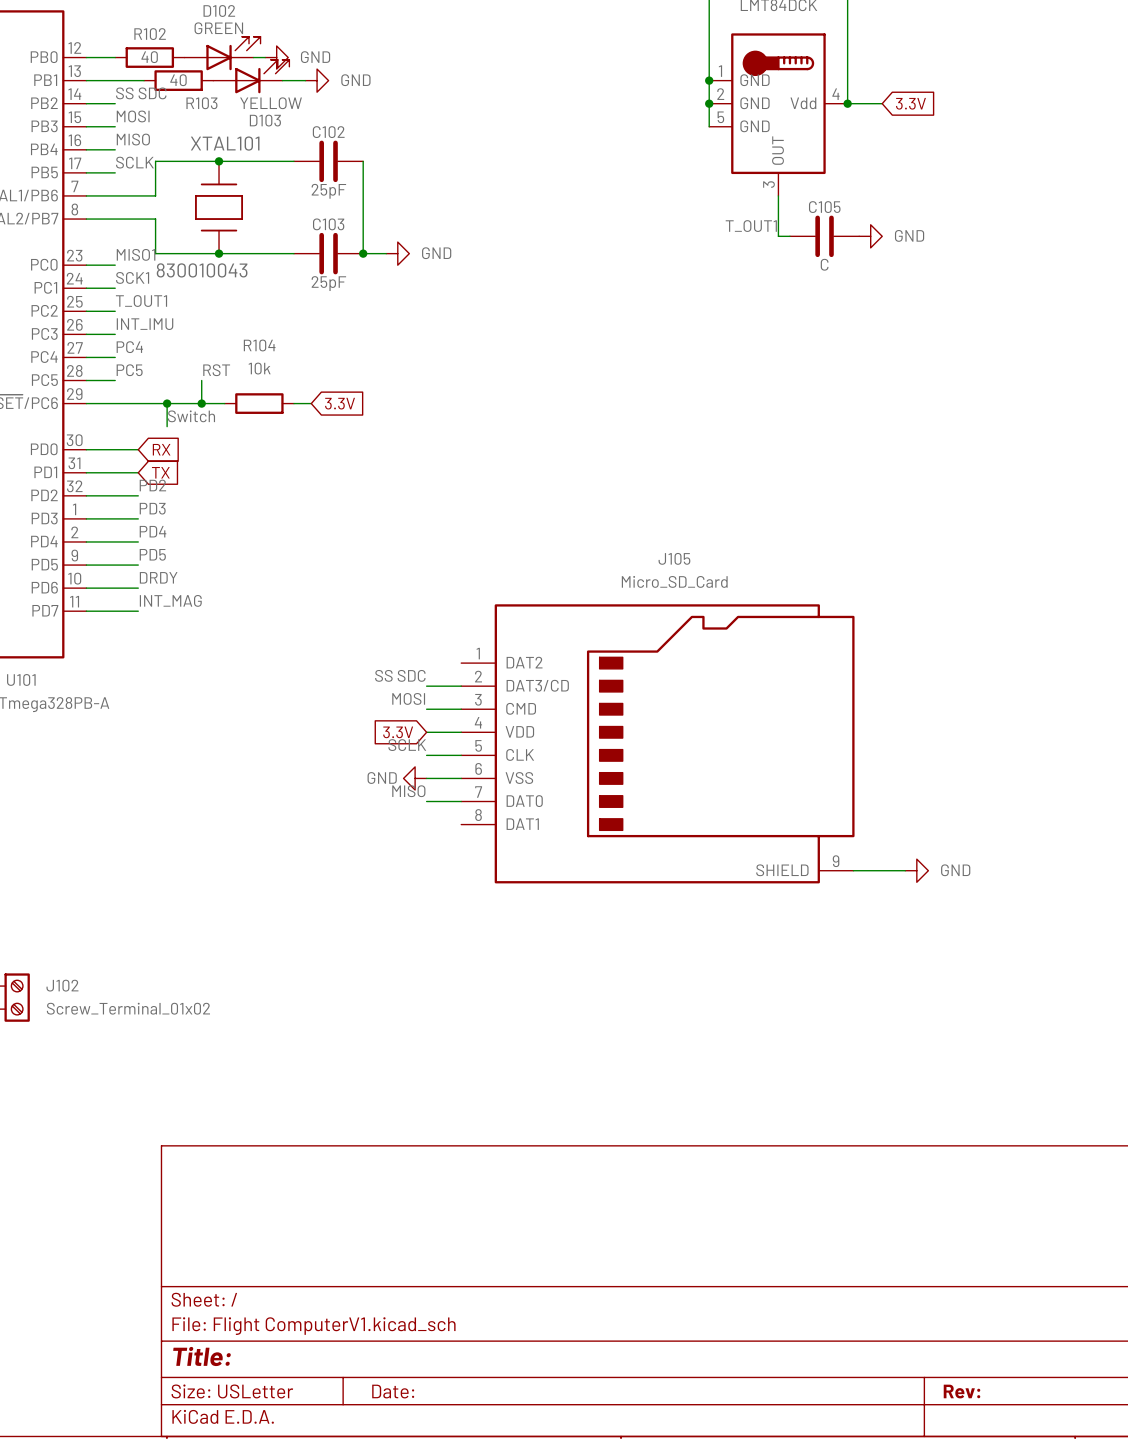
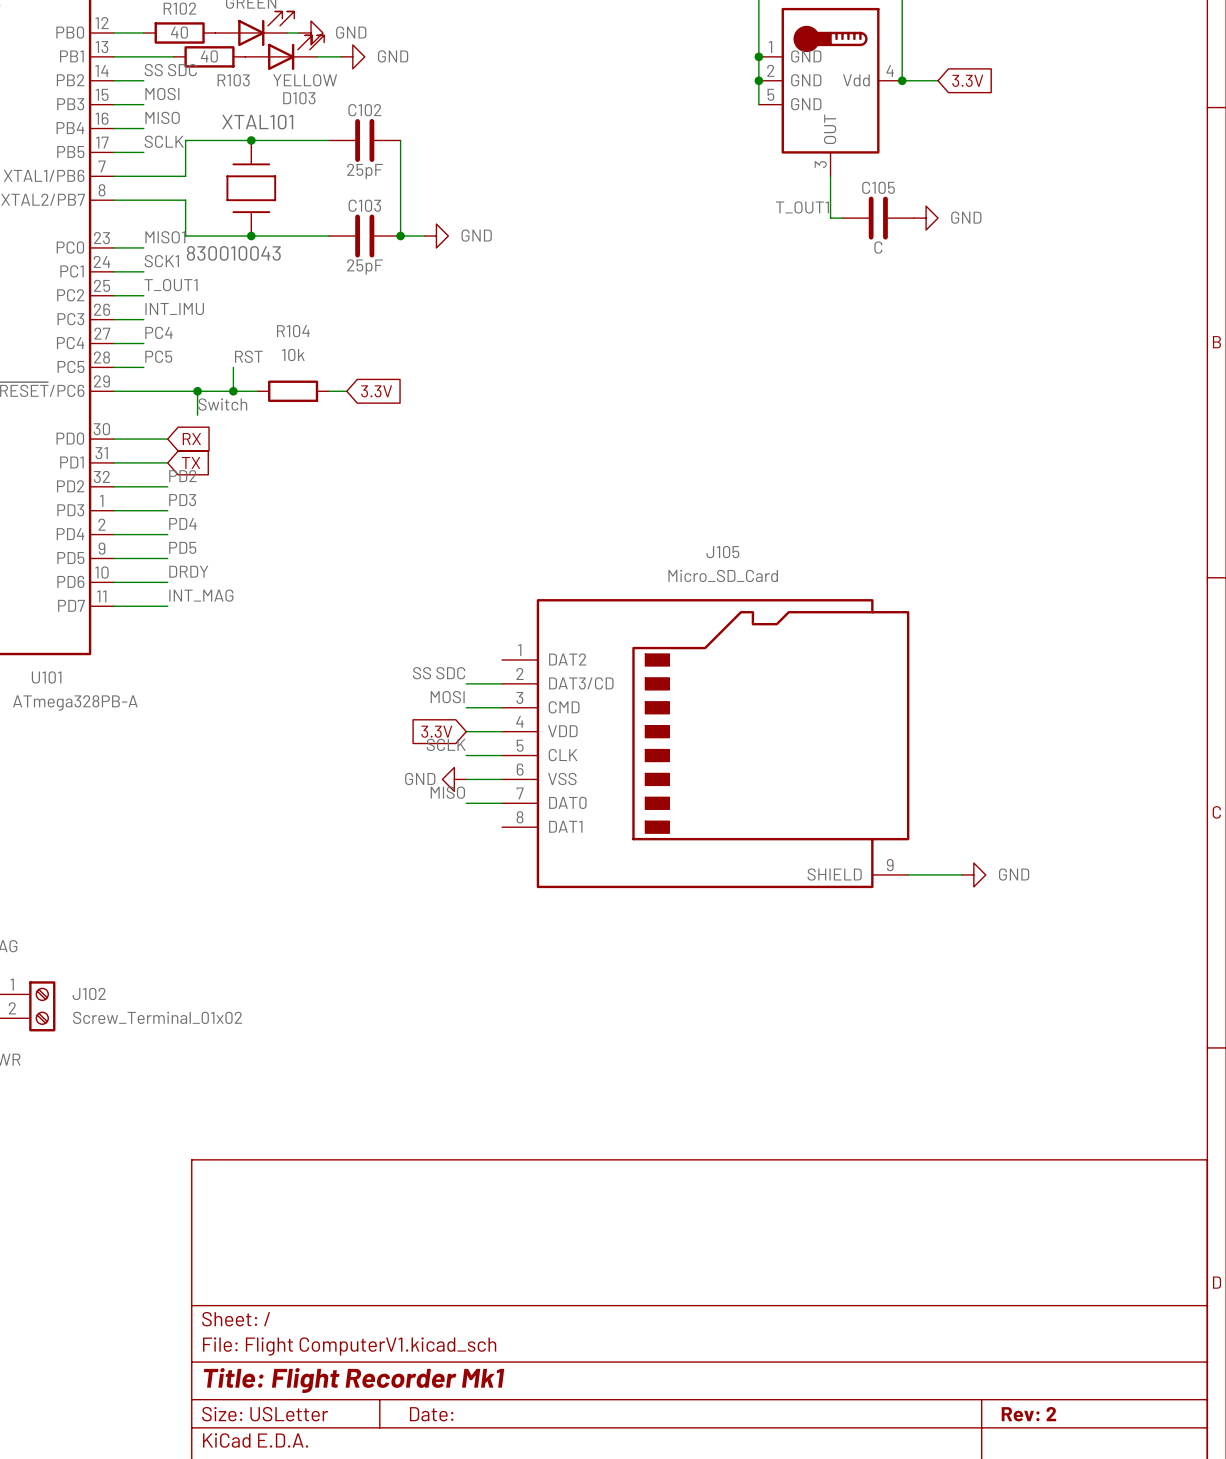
title block: Title: (202, 1356) -> Title: Flight Recorder Mk1 (354, 1380)
title block: Rev: (961, 1391) -> Rev: 2 (1028, 1414)

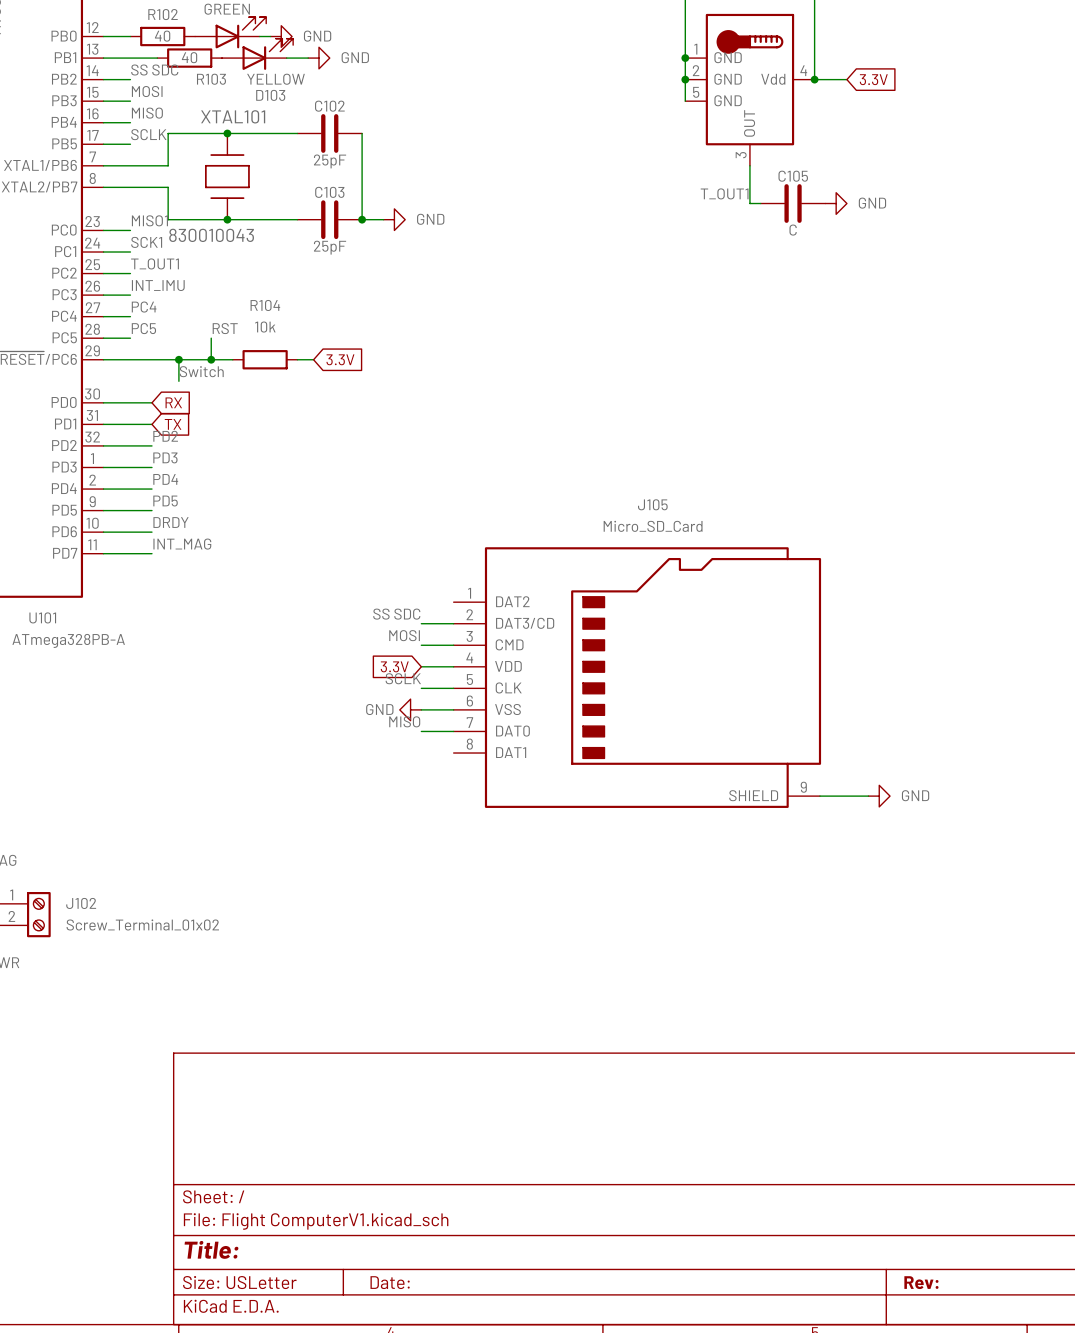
title block: Title: Flight Recorder Mk1 (354, 1380) -> Title: (211, 1249)
title block: Rev: 2 (1028, 1414) -> Rev: (921, 1282)

